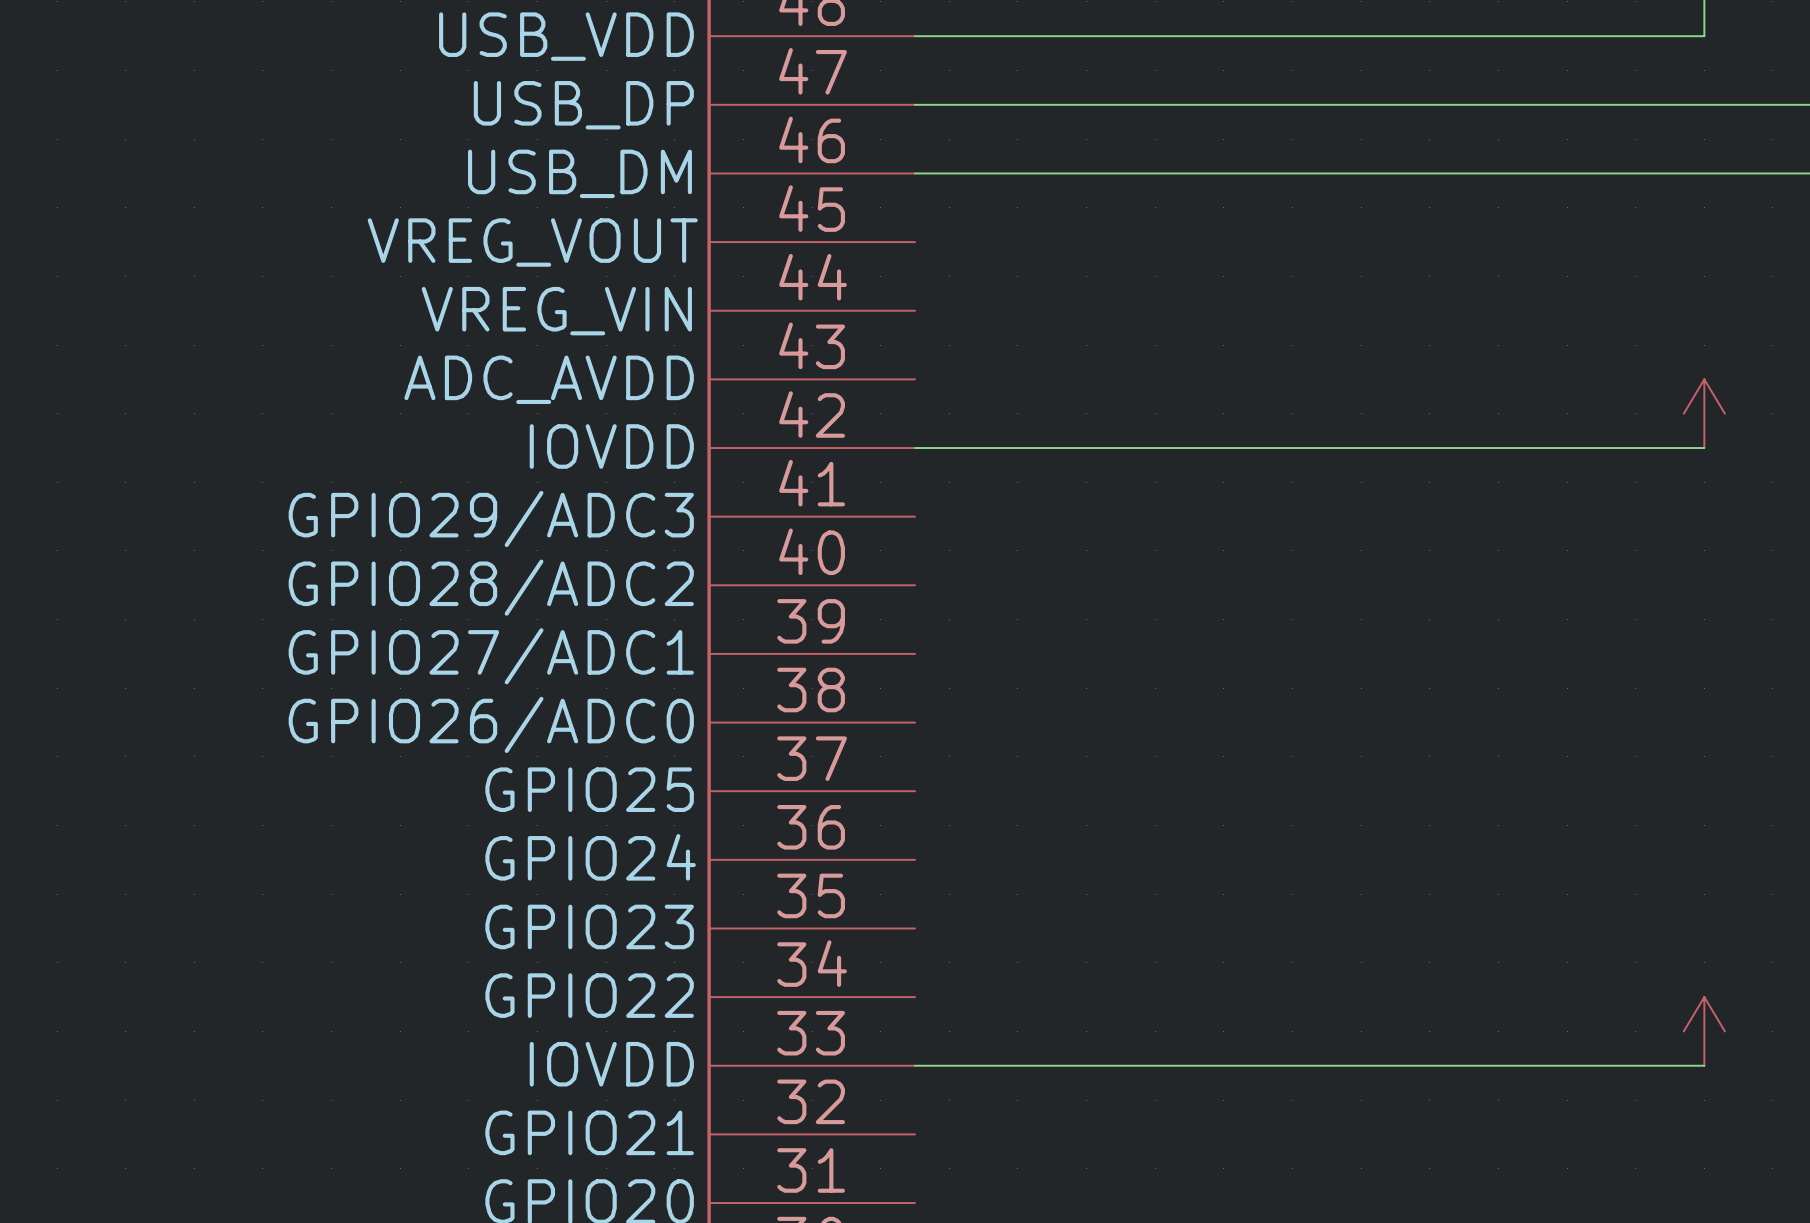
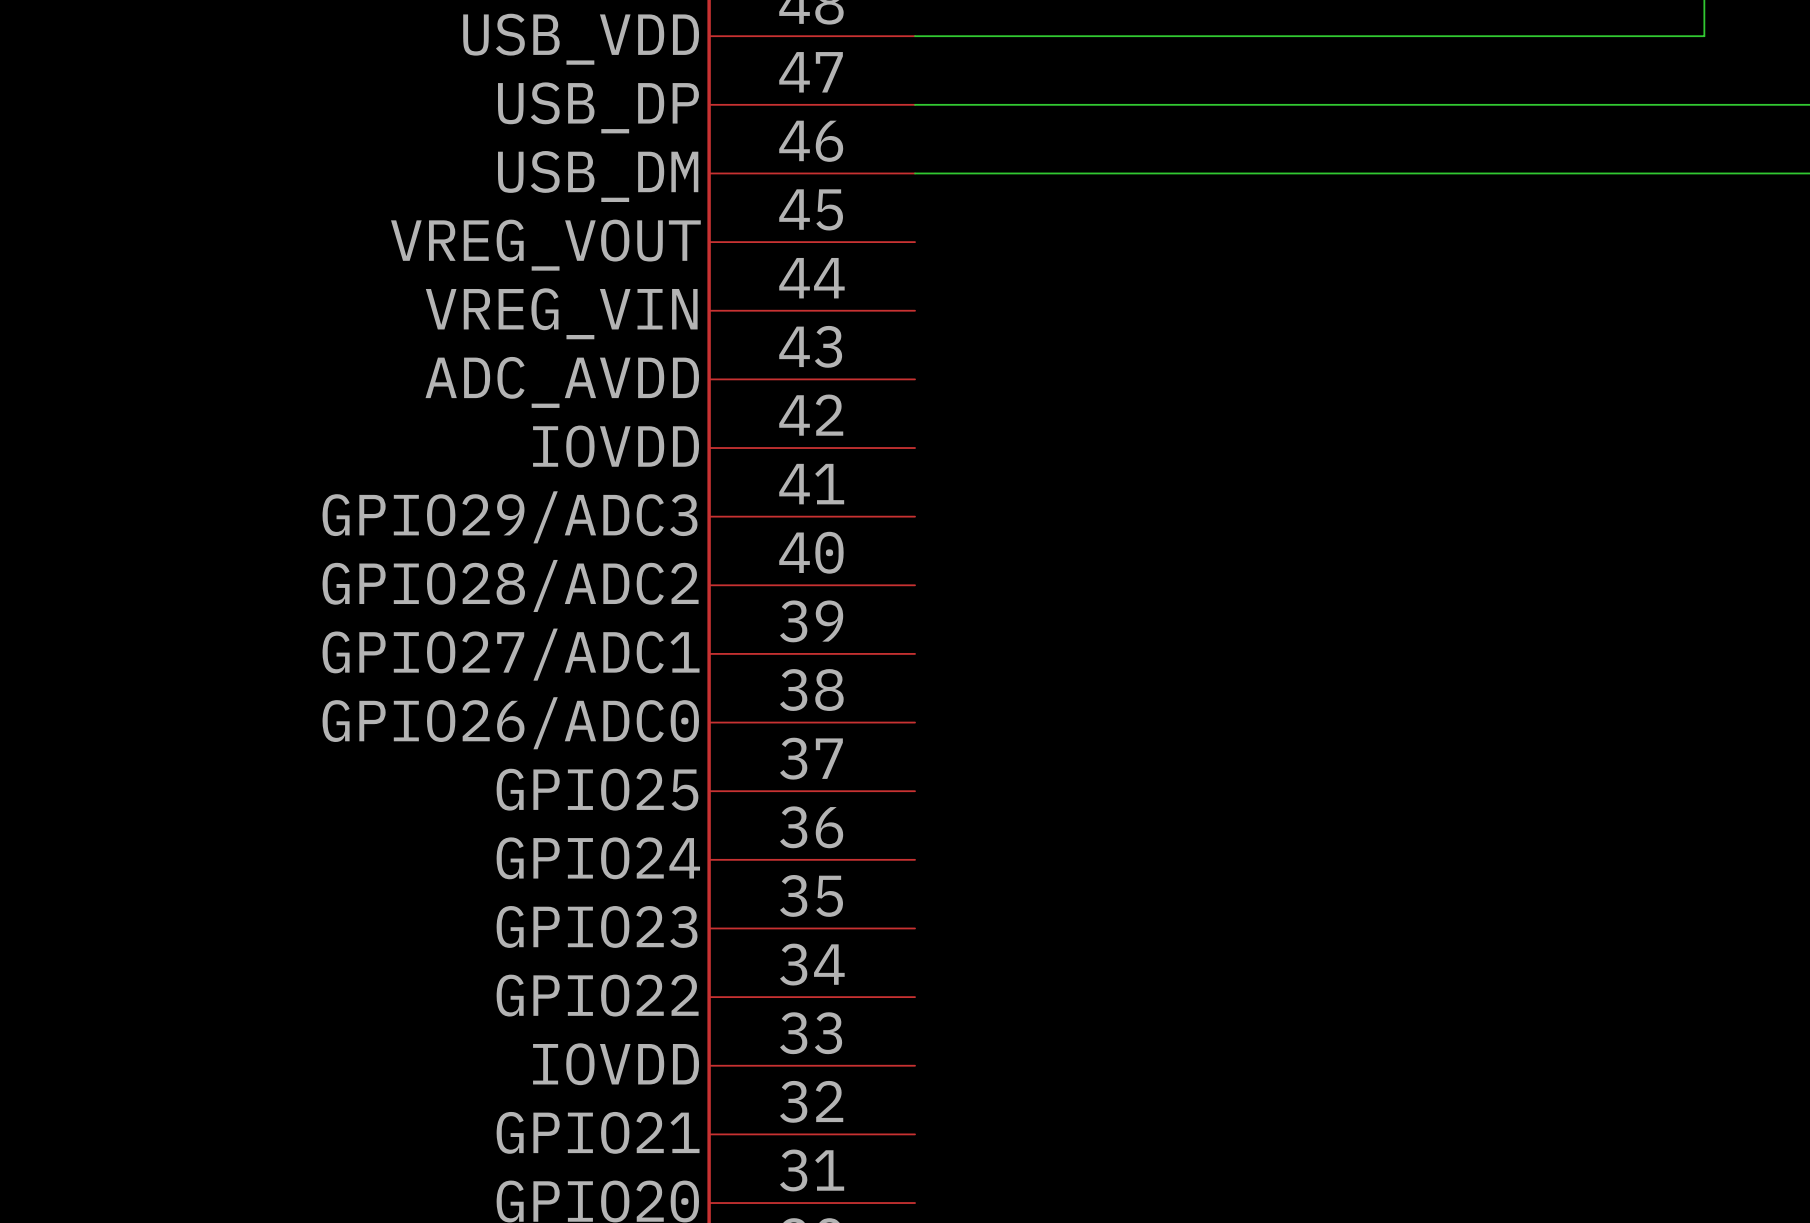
power symbol: (1704, 413) -> none
wire: (915, 448) (1704, 448) -> none
power symbol: (1704, 1031) -> none
wire: (915, 1065) (1704, 1065) -> none

